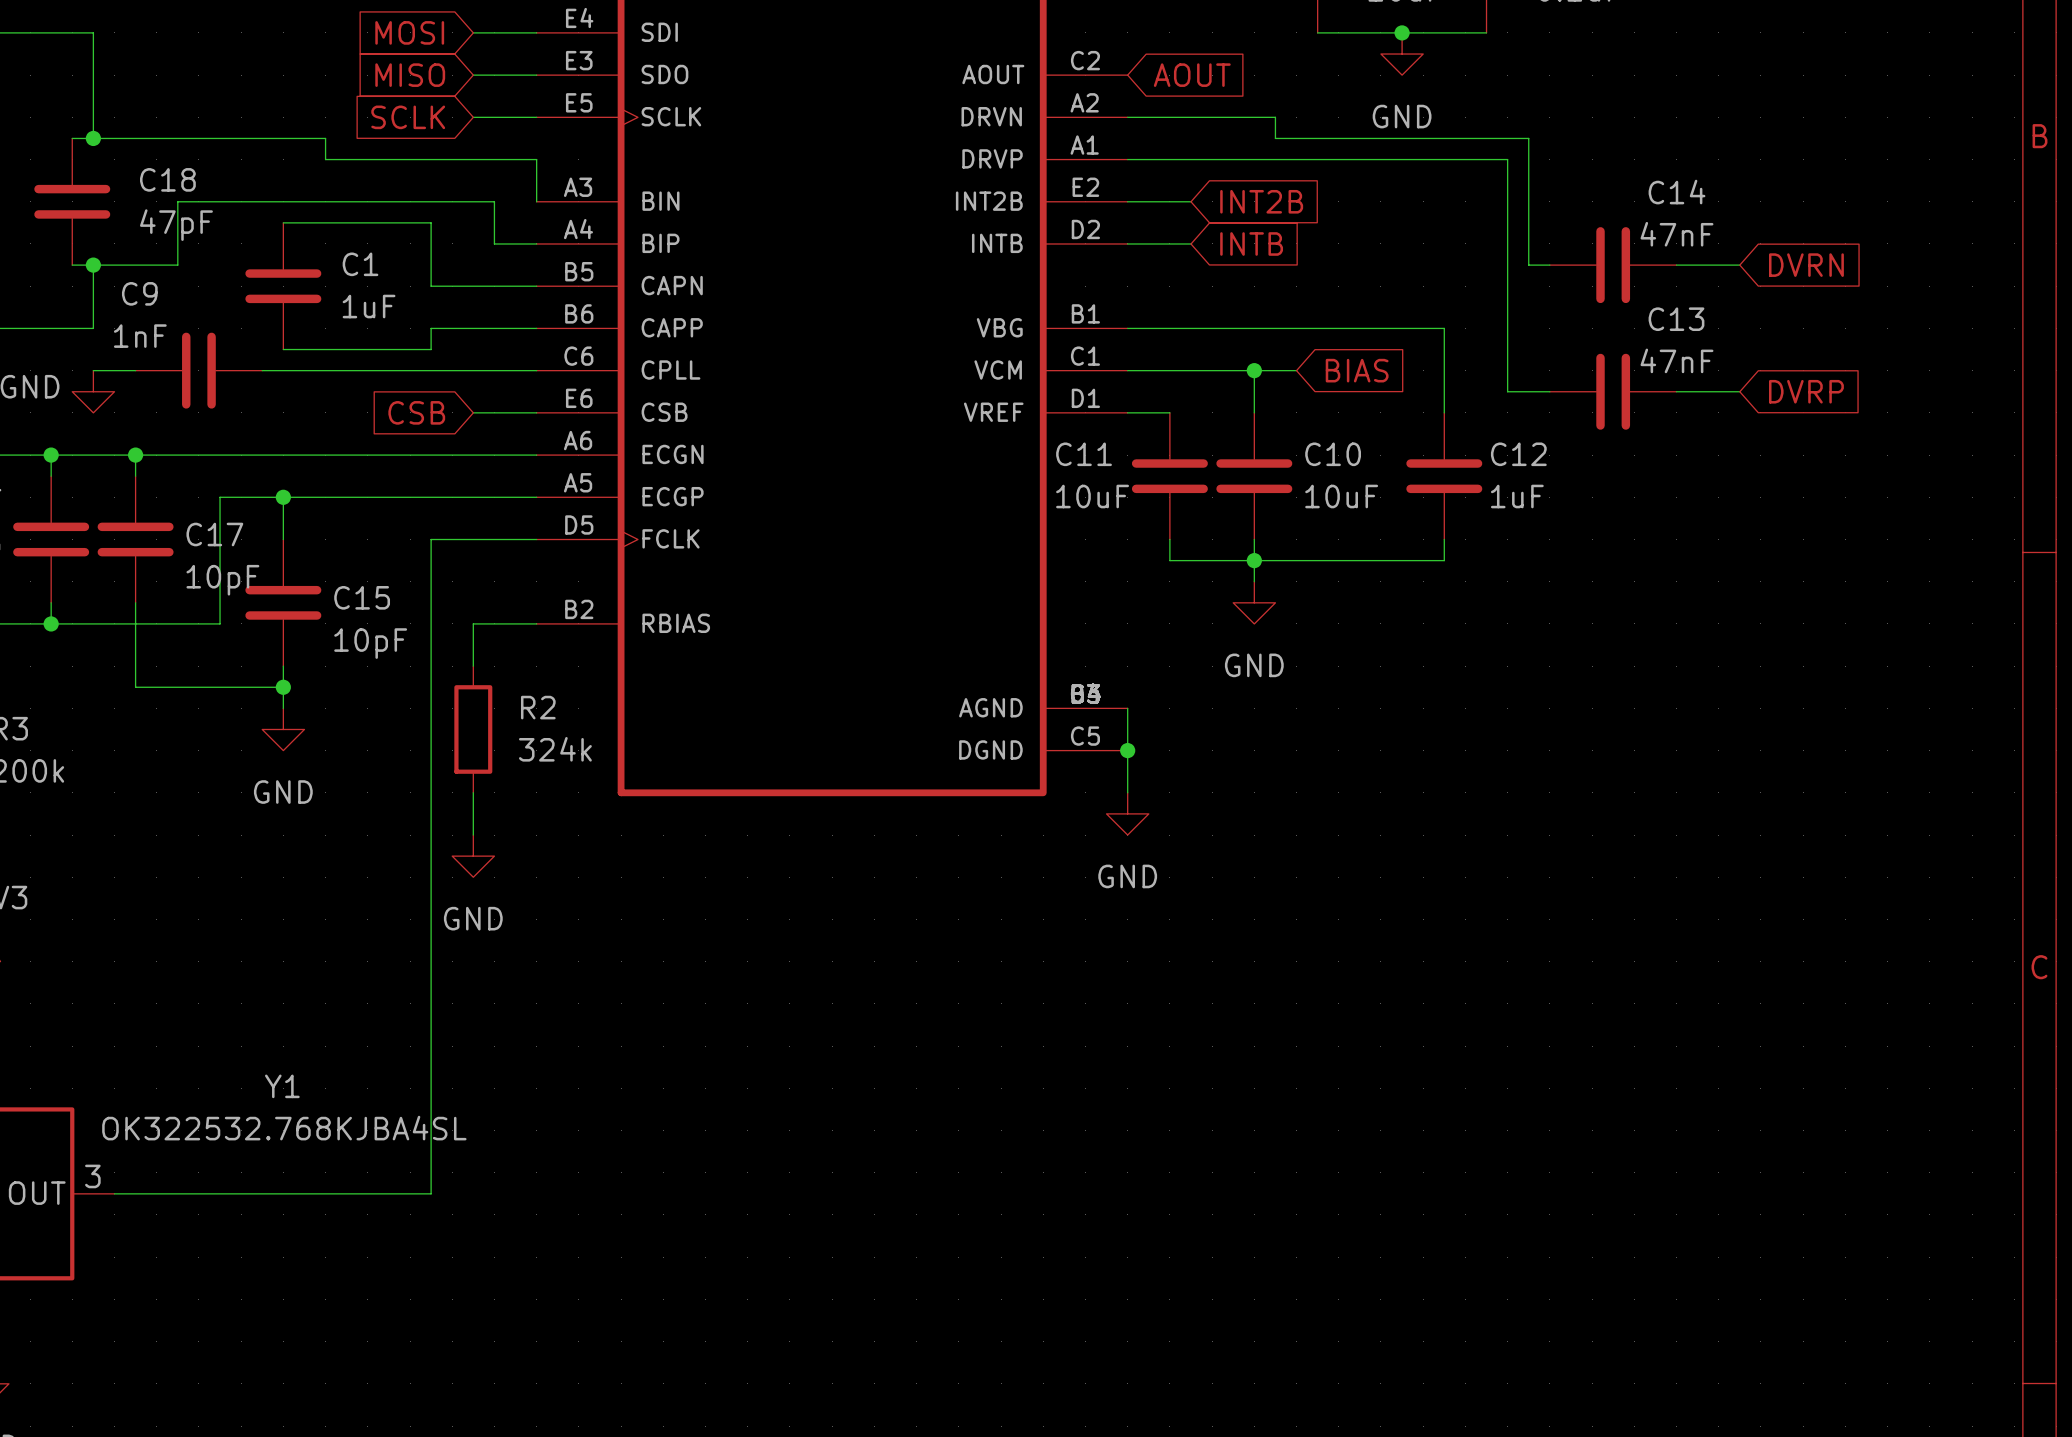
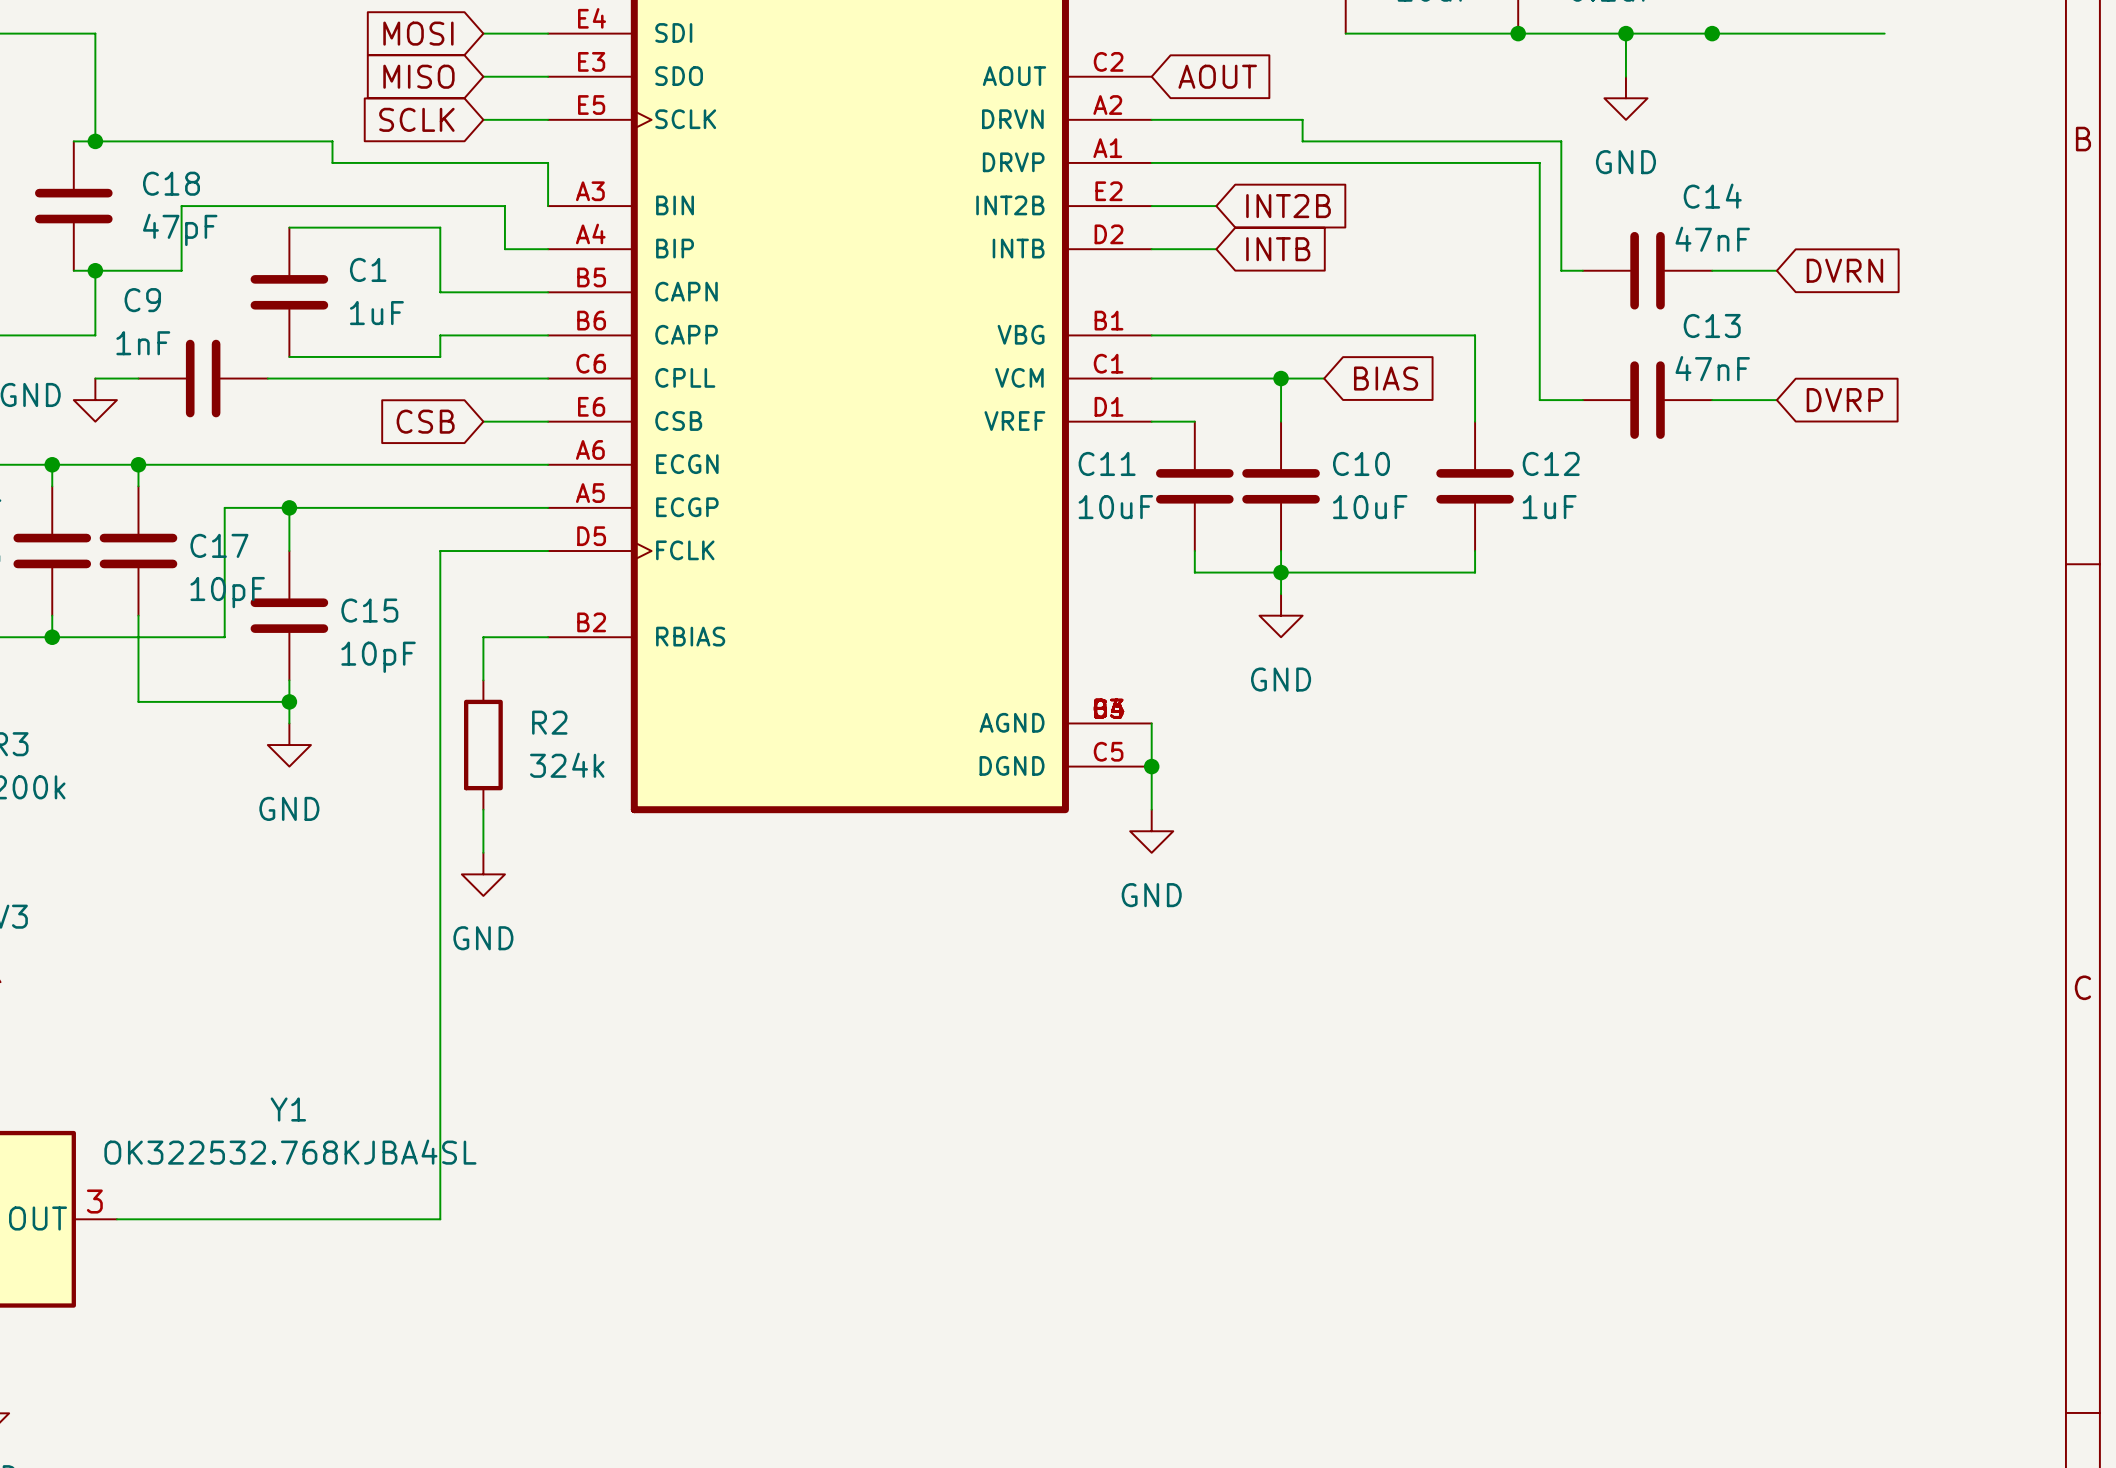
junction position: (1402, 32) -> (1518, 33)
wire: none -> (1518, 33) (1884, 33)
wire: none -> (1625, 33) (1625, 76)
junction: none -> (1625, 33)
junction: none -> (1712, 33)
power symbol: GND (1402, 54) -> none
power symbol: none -> GND (1625, 98)

